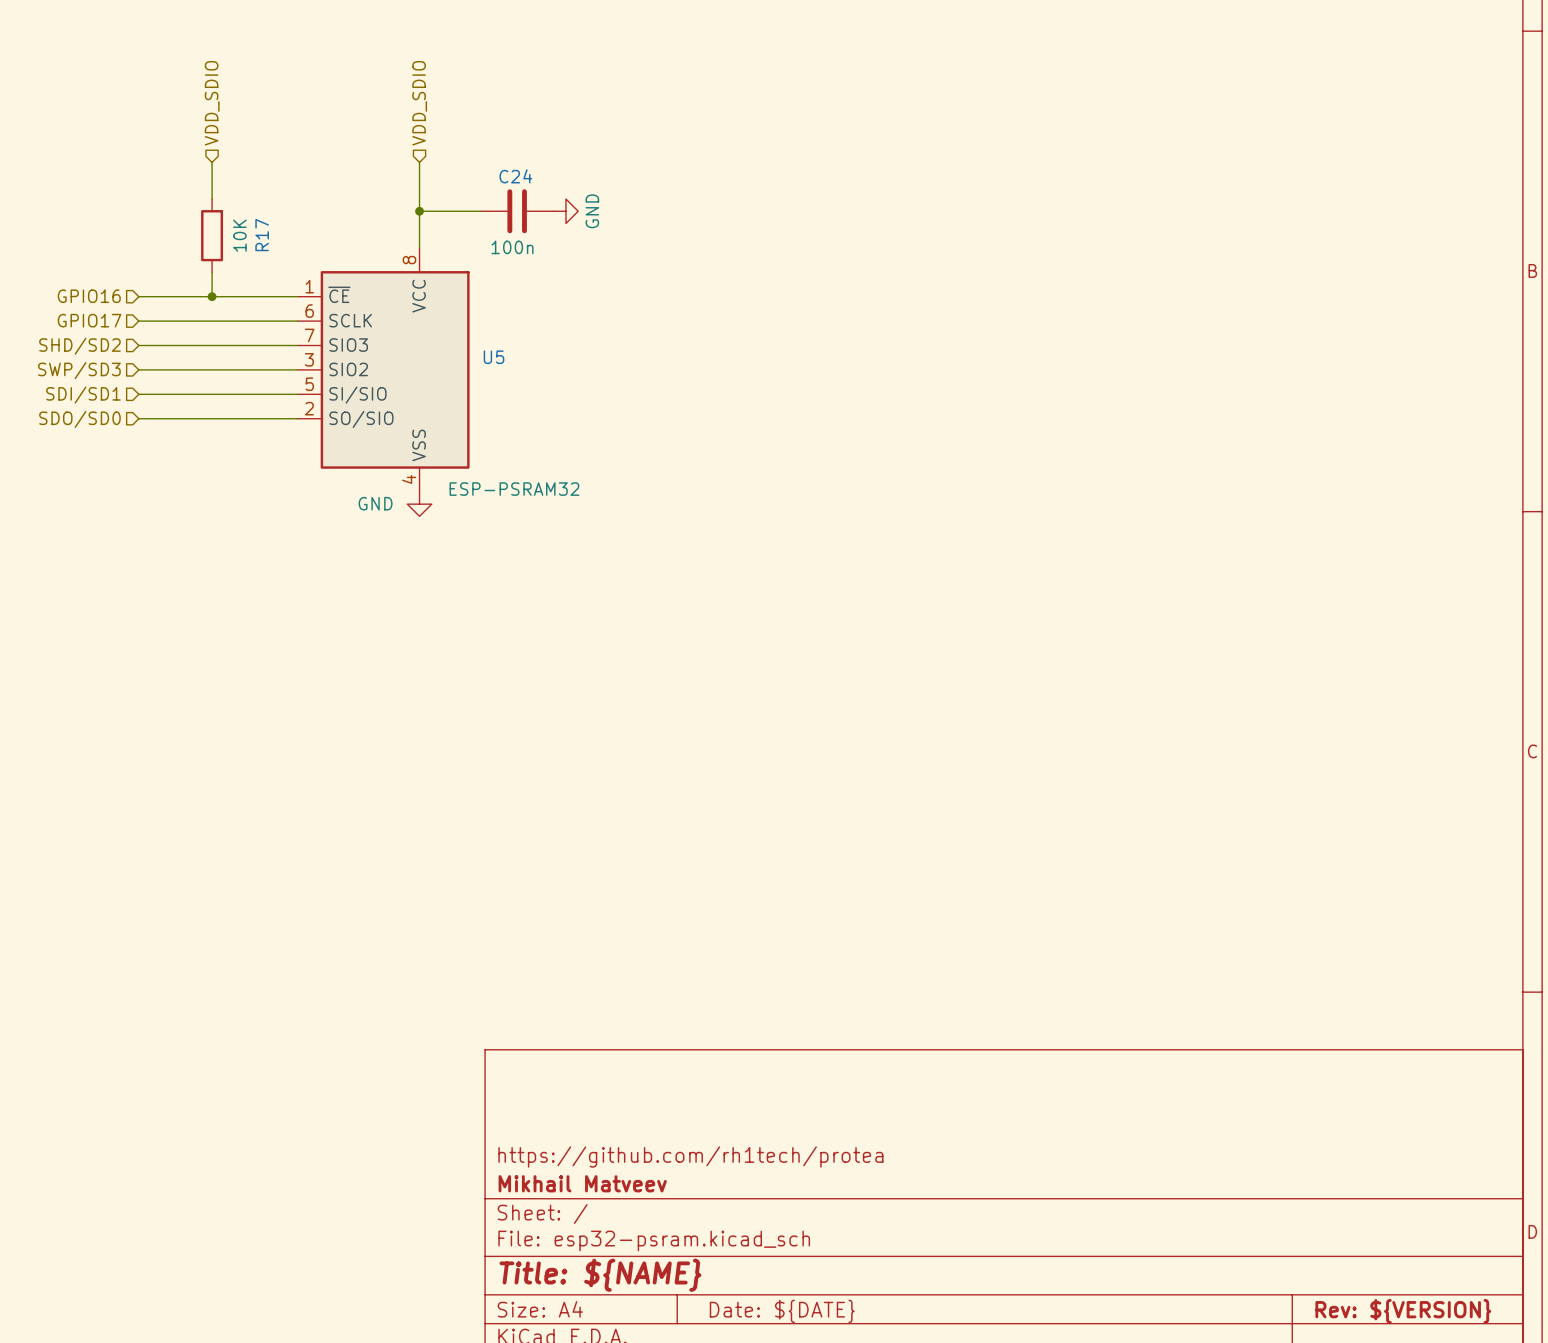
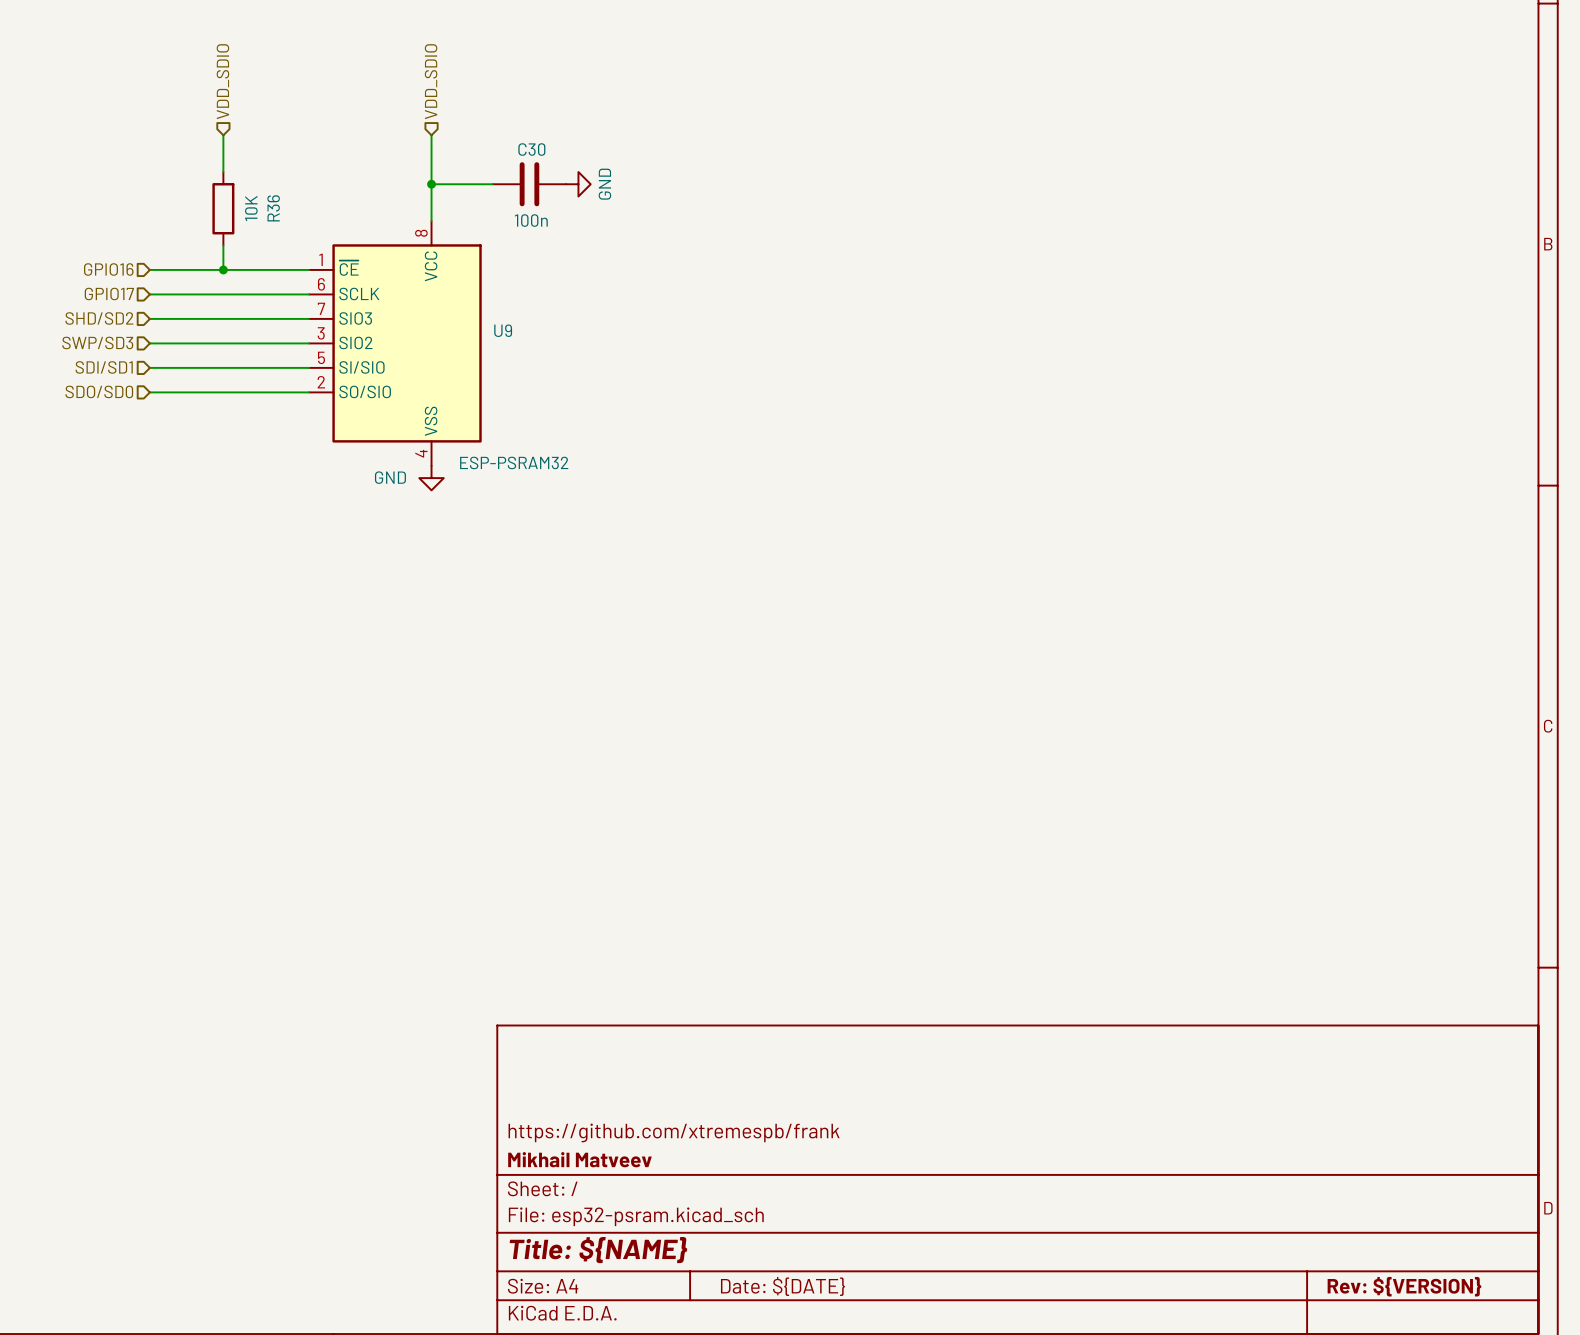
C24 name: C24 (515, 176) -> C30 (531, 149)
R17 name: R17 (262, 235) -> R36 (273, 208)
U5 name: U5 (494, 357) -> U9 (503, 330)
title block: https://github.com/rh1tech/protea (690, 1157) -> https://github.com/xtremespb/frank (674, 1132)

